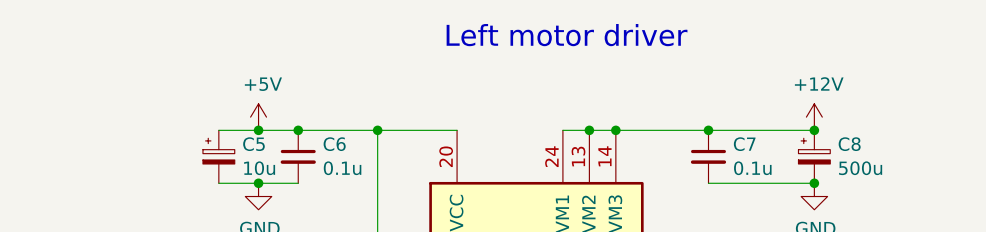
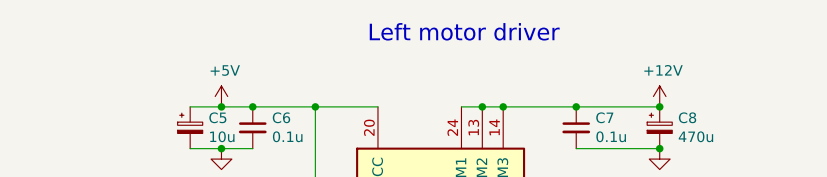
C8 value: 500u (860, 168) -> 470u (695, 136)

